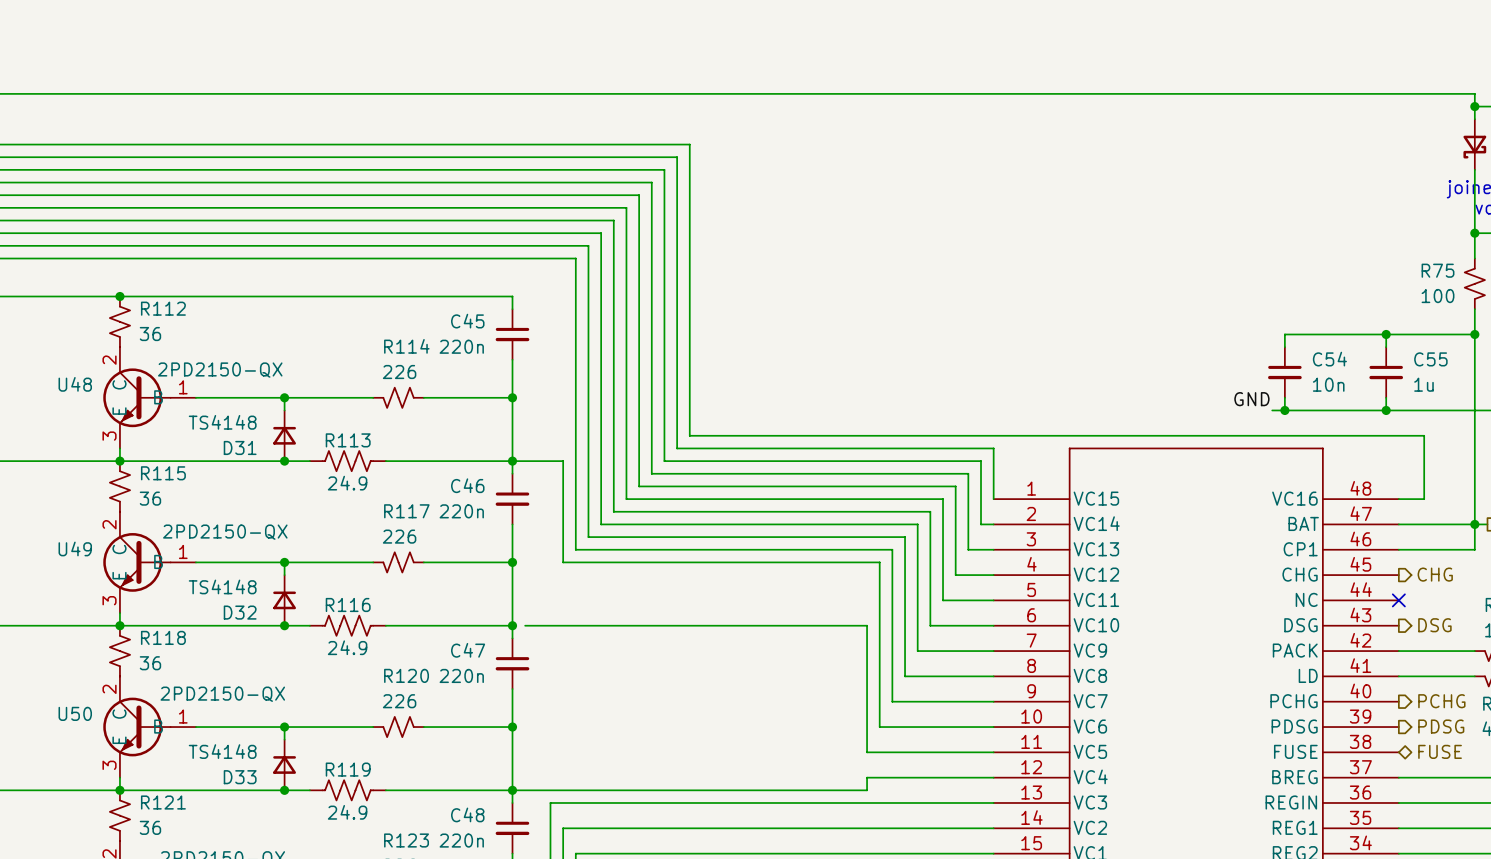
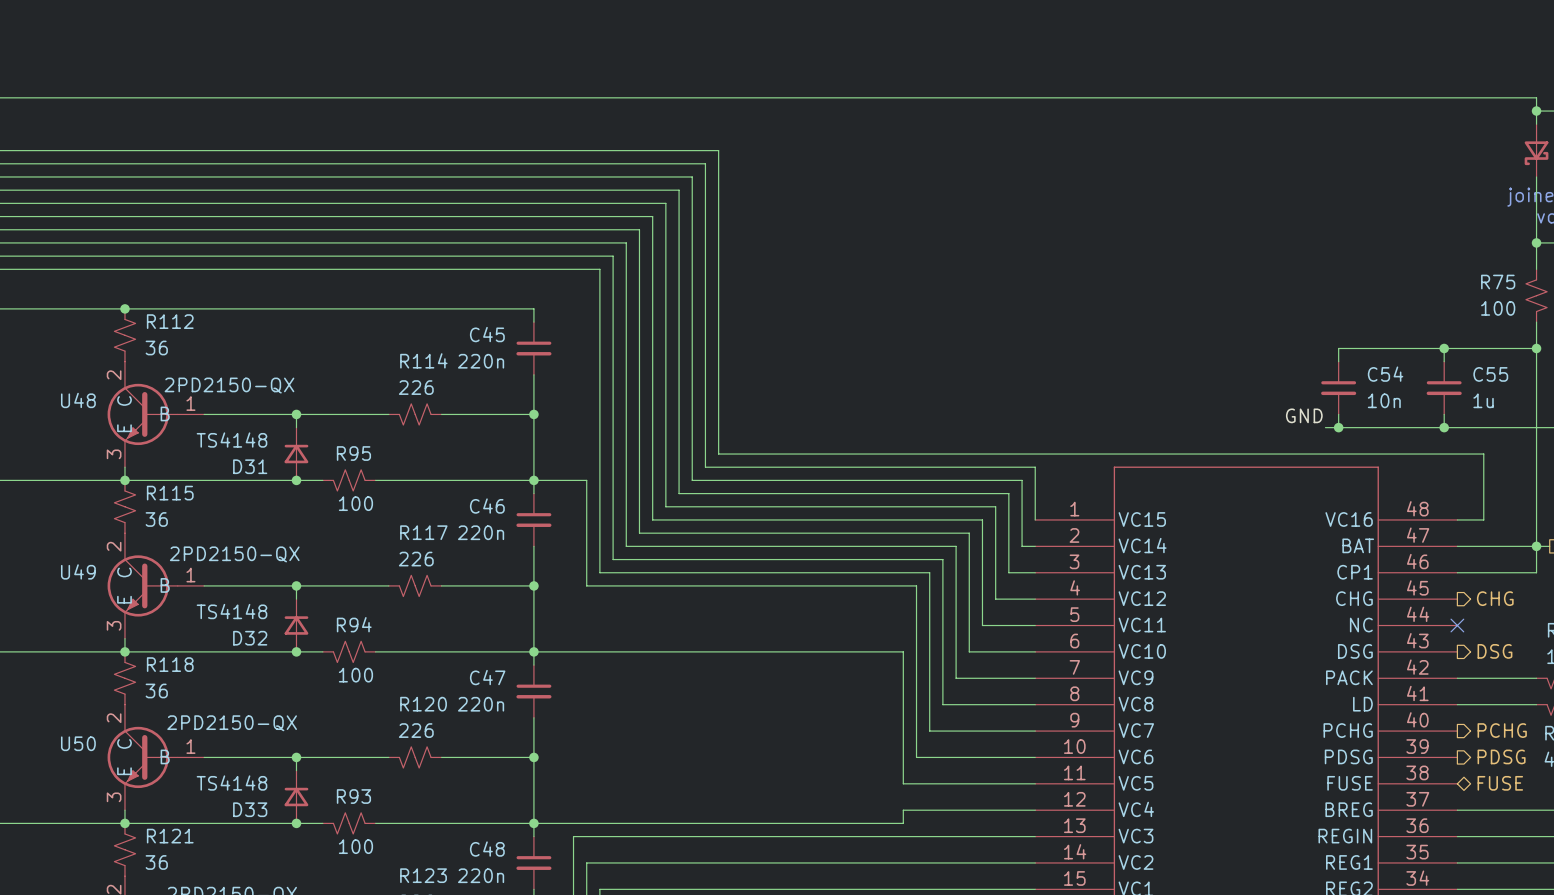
R95: none -> 100 (349, 480)
R113: 24.9 (347, 461) -> none
R94: none -> 100 (349, 651)
R116: 24.9 (347, 625) -> none
wire: none -> (533, 651) (547, 651)
R93: none -> 100 (349, 823)
R119: 24.9 (347, 790) -> none

